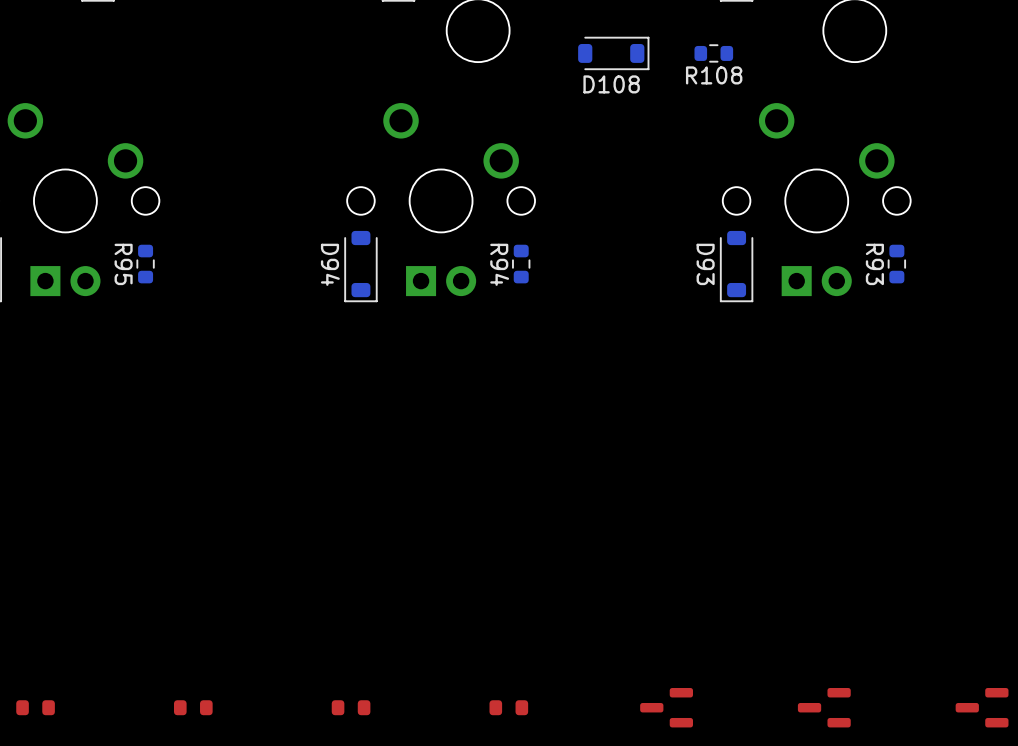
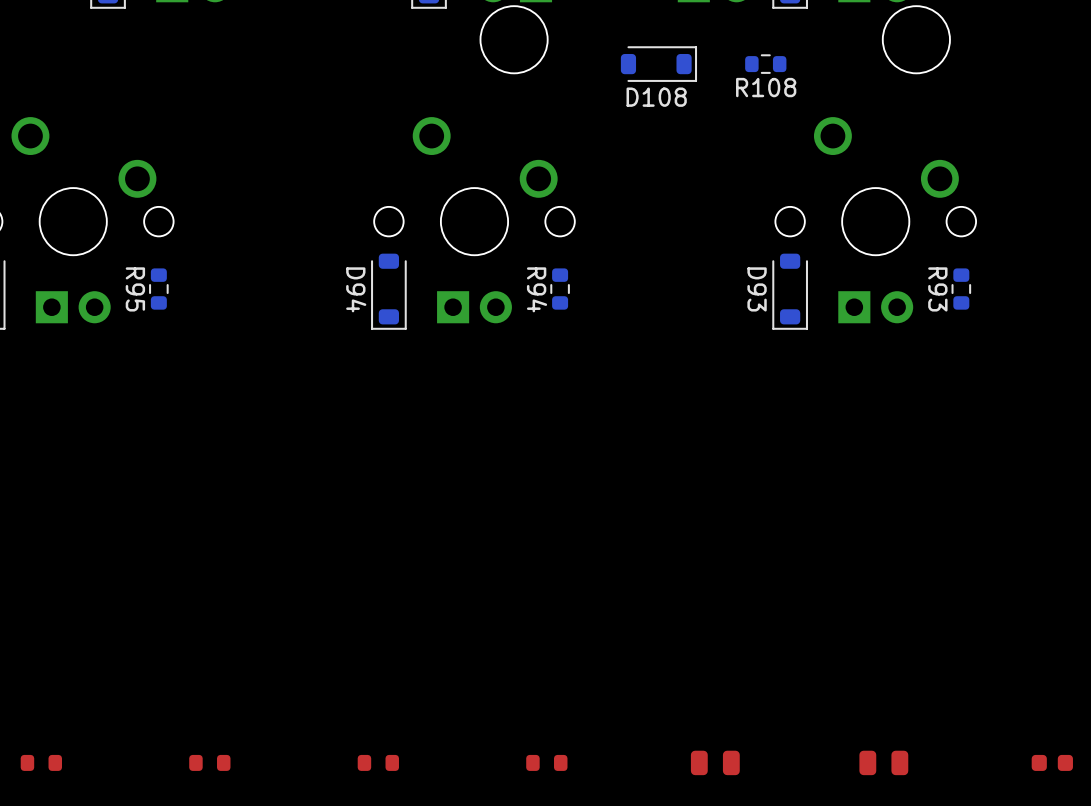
part footprint: [640, 688, 693, 728] -> [690, 750, 740, 776]
part footprint: [797, 688, 851, 728] -> [859, 750, 909, 776]
part footprint: [955, 688, 1009, 728] -> [1031, 754, 1073, 771]

